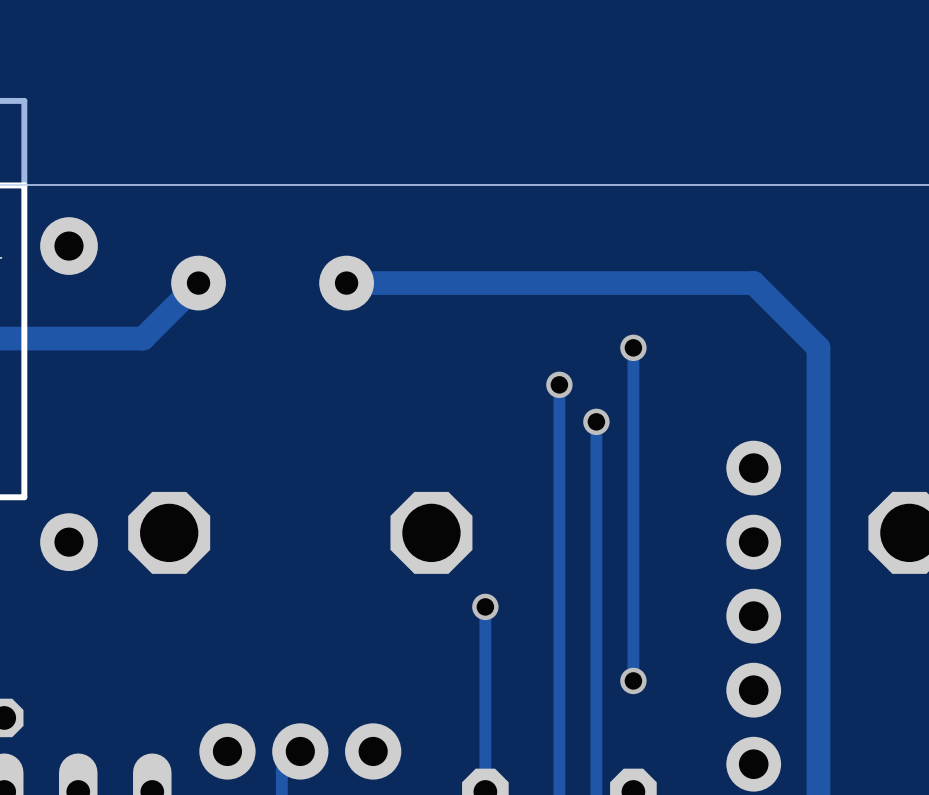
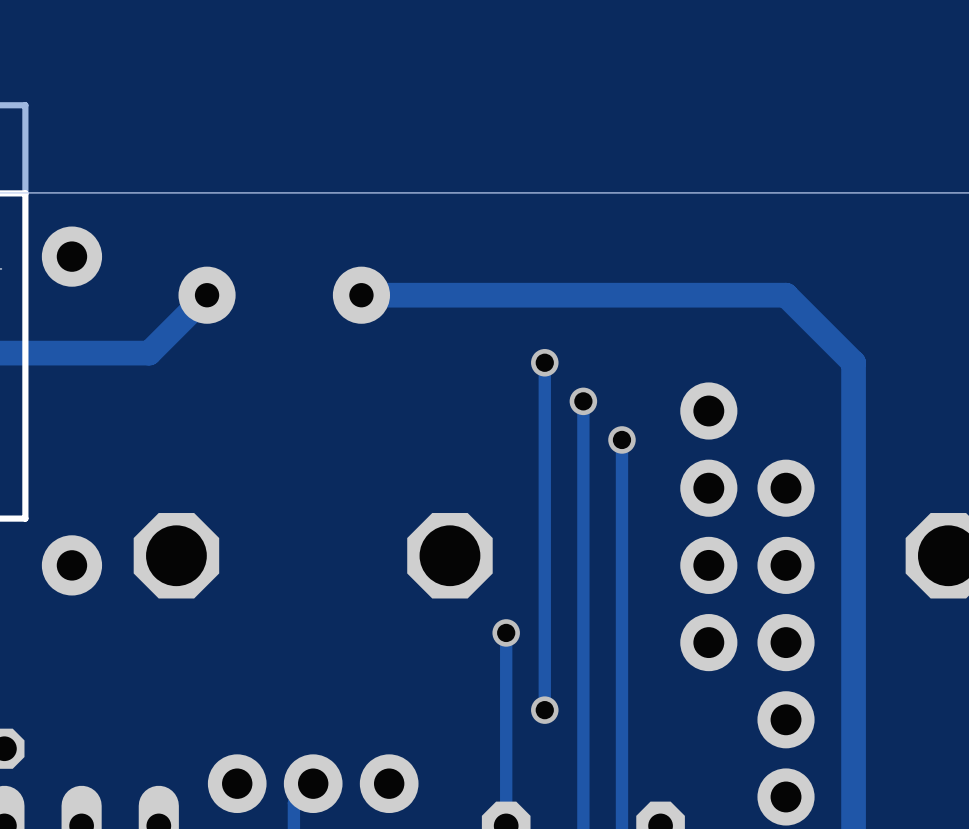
track: (633, 347) (633, 680) -> (544, 362) (544, 710)
via position: (633, 347) -> (544, 362)
part: none -> (708, 449)
part: none -> (708, 603)
via position: (633, 680) -> (544, 710)

